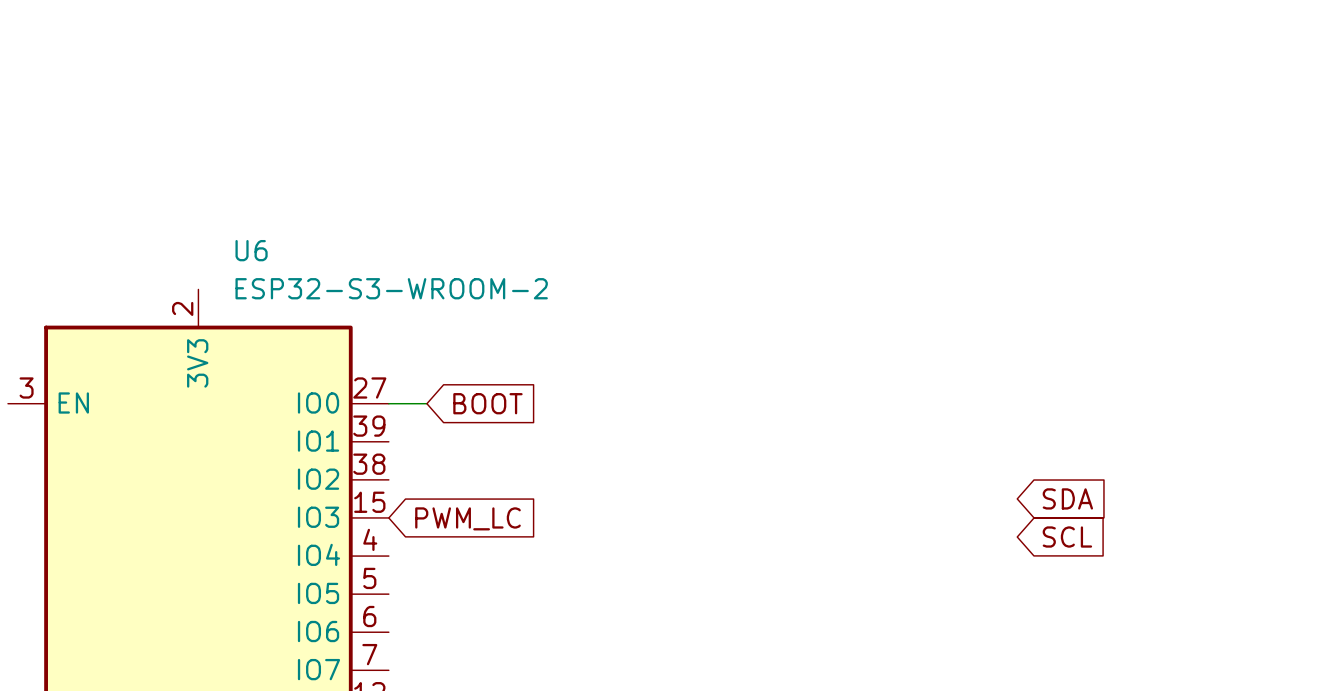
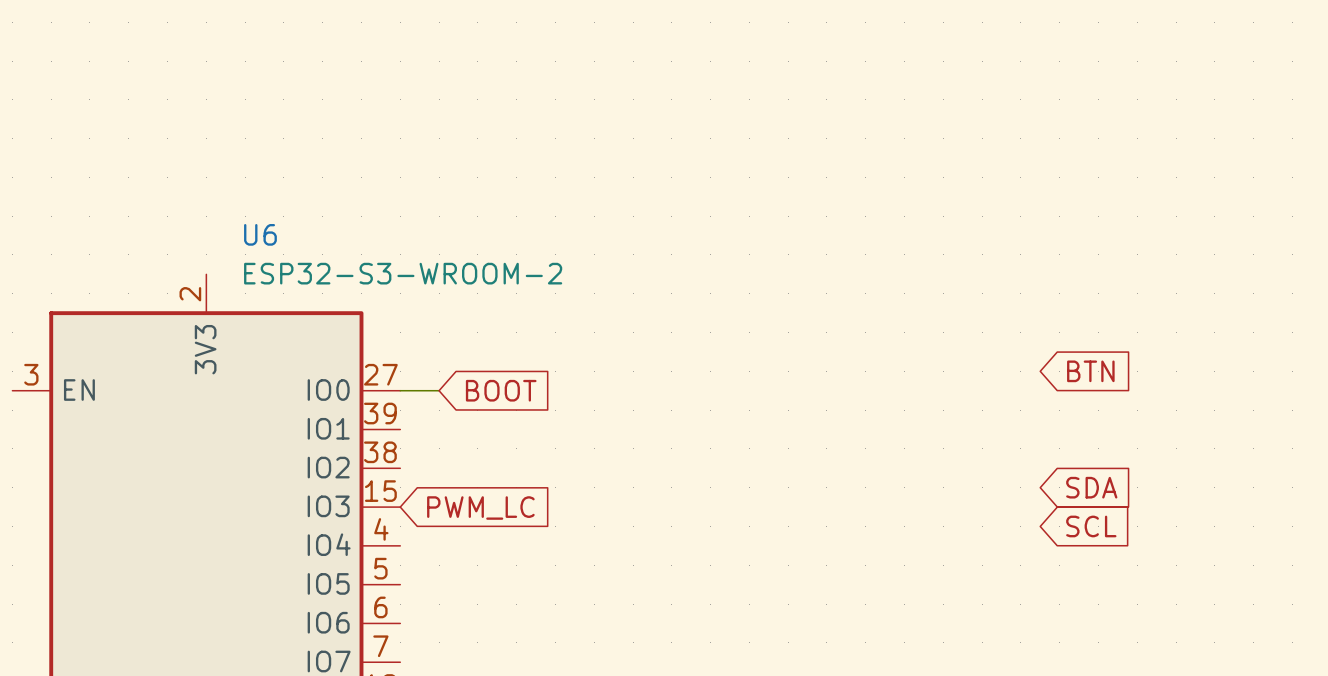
global label: none -> BTN (1090, 371)

